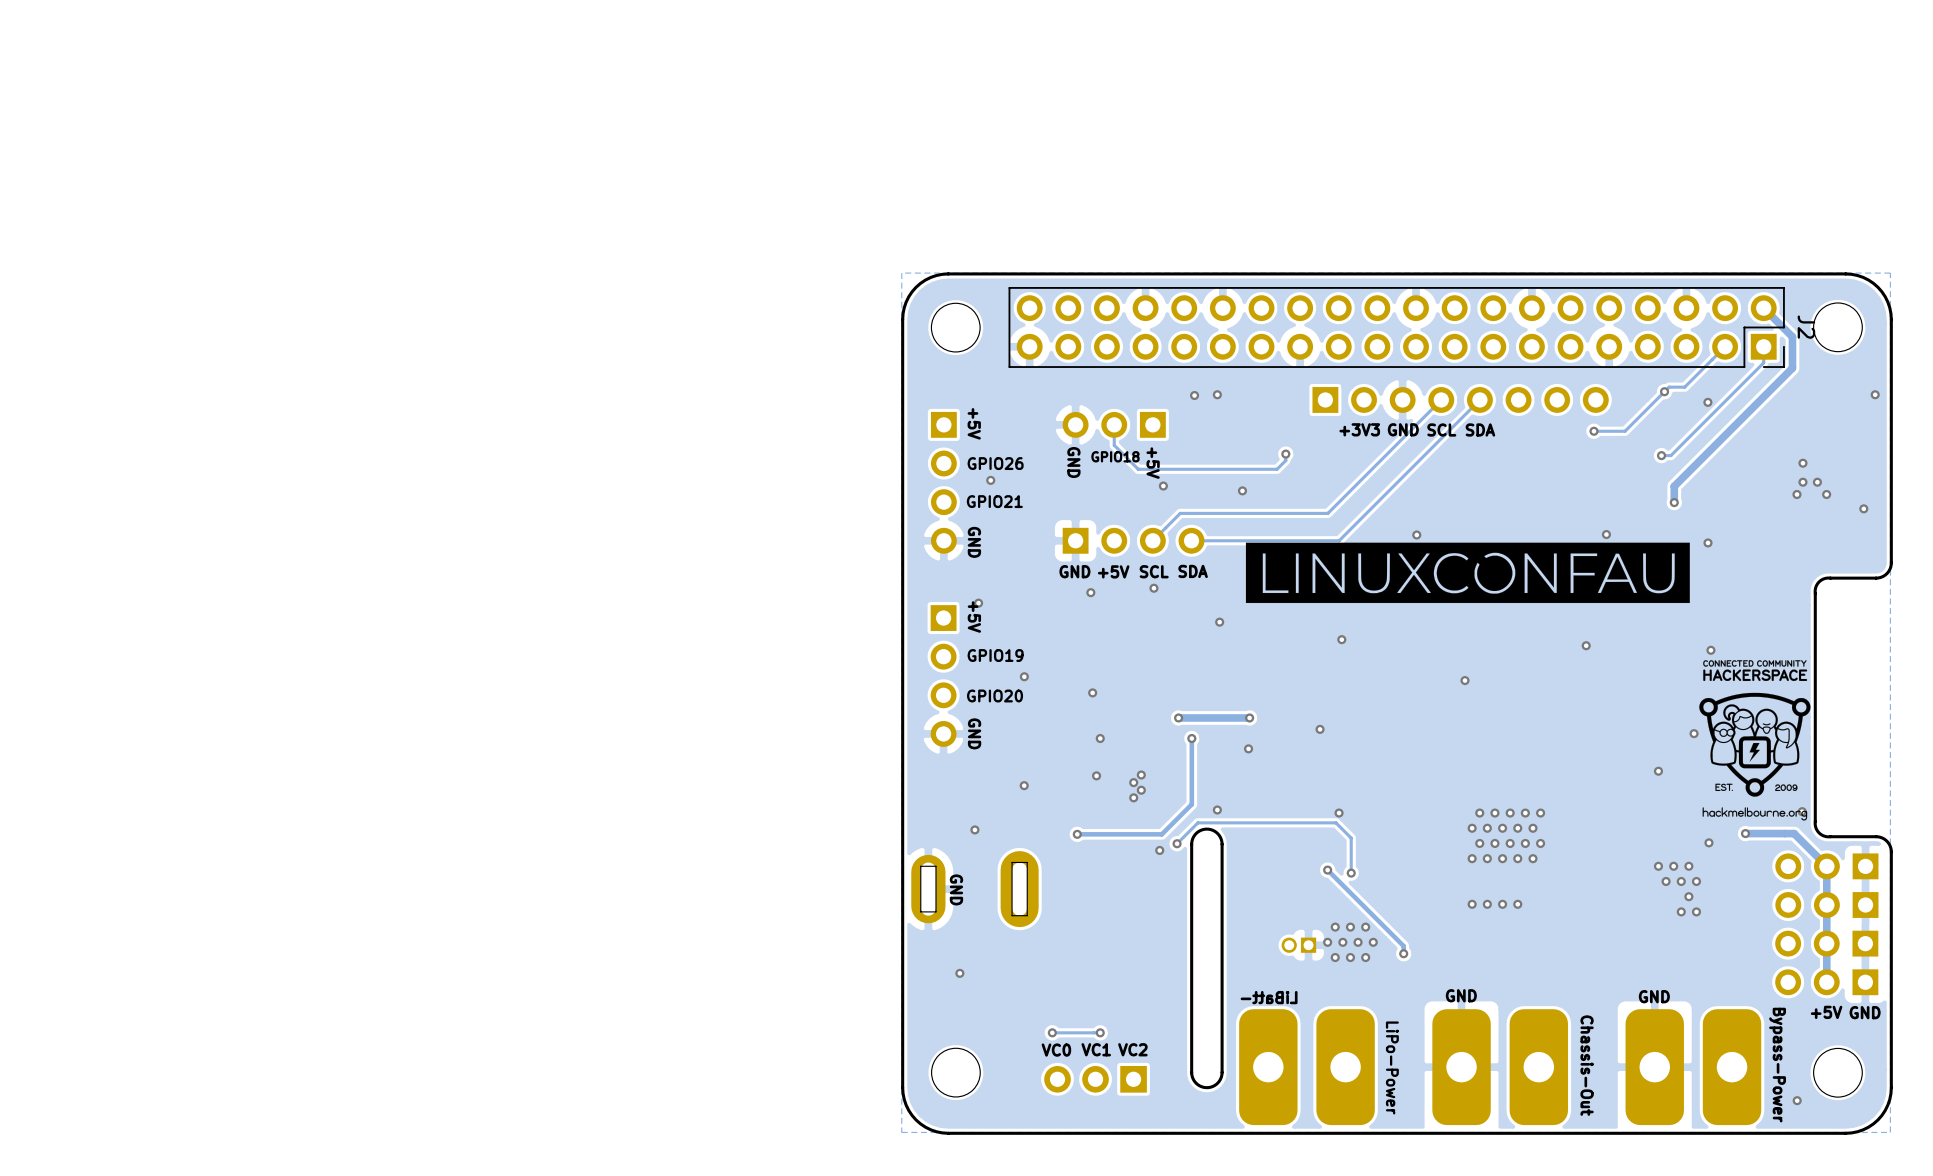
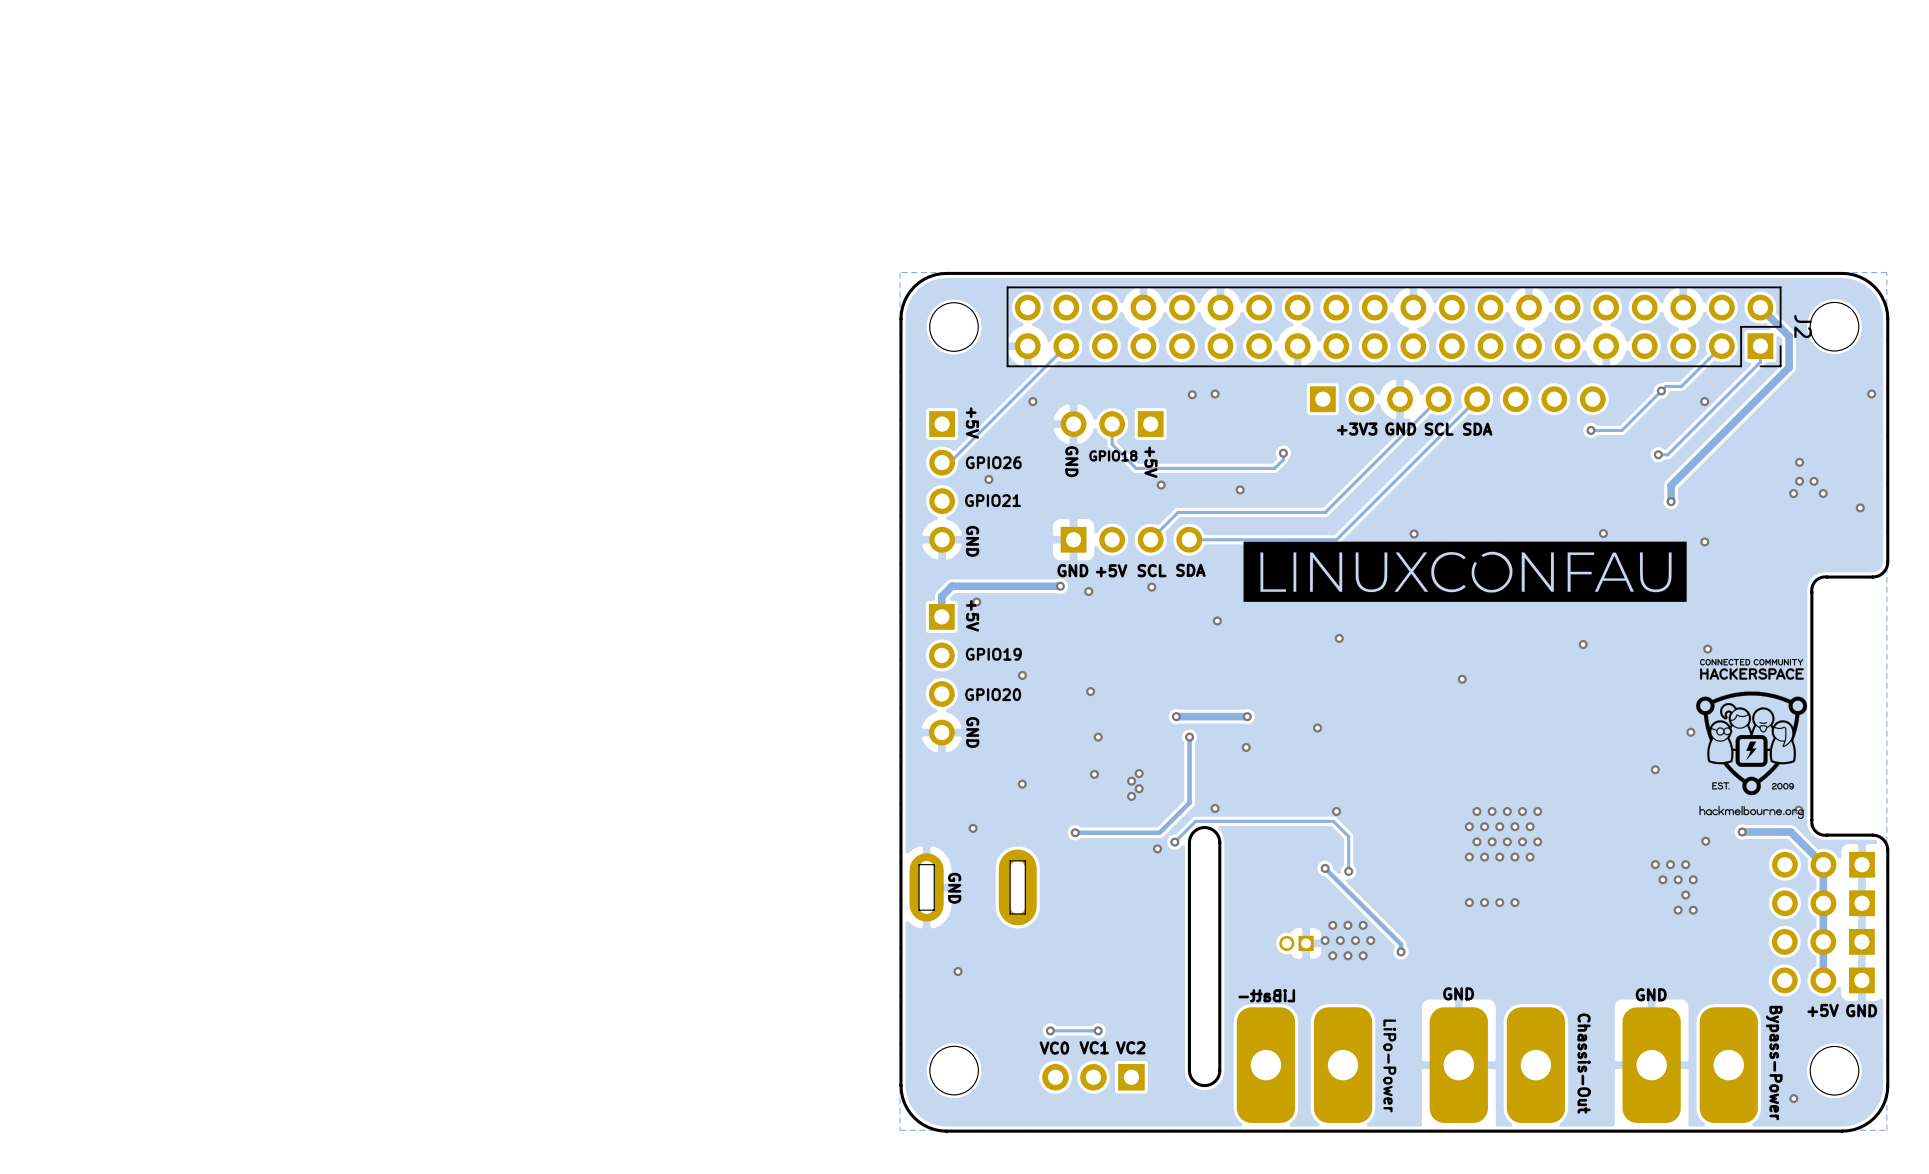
track: none -> (1066, 346) (949, 462) (942, 462)
via: none -> (1032, 401)
track: none -> (1060, 586) (951, 586) (941, 596) (941, 616)
via: none -> (1060, 586)

